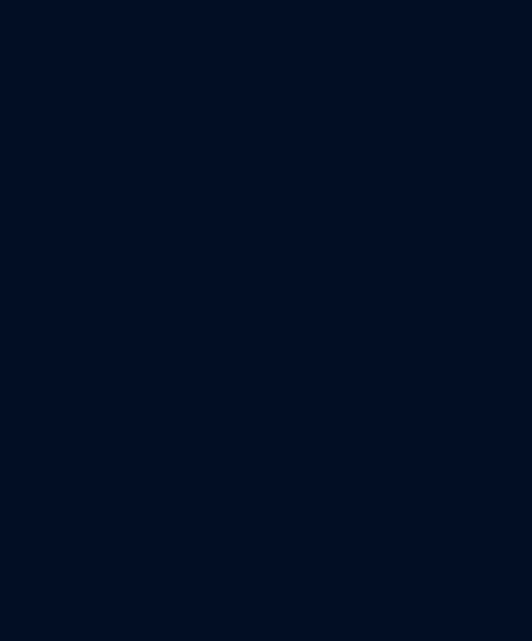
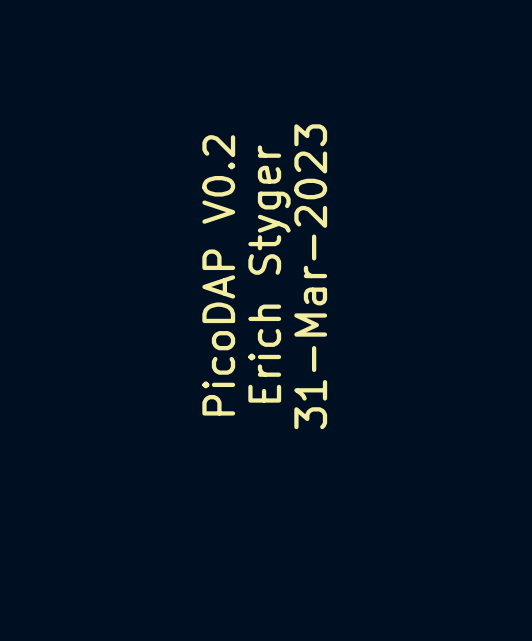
text: none -> Erich Styger (269, 274)
text: none -> PicoDAP V0.2 (218, 275)
text: none -> 31-Mar-2023 (310, 276)

